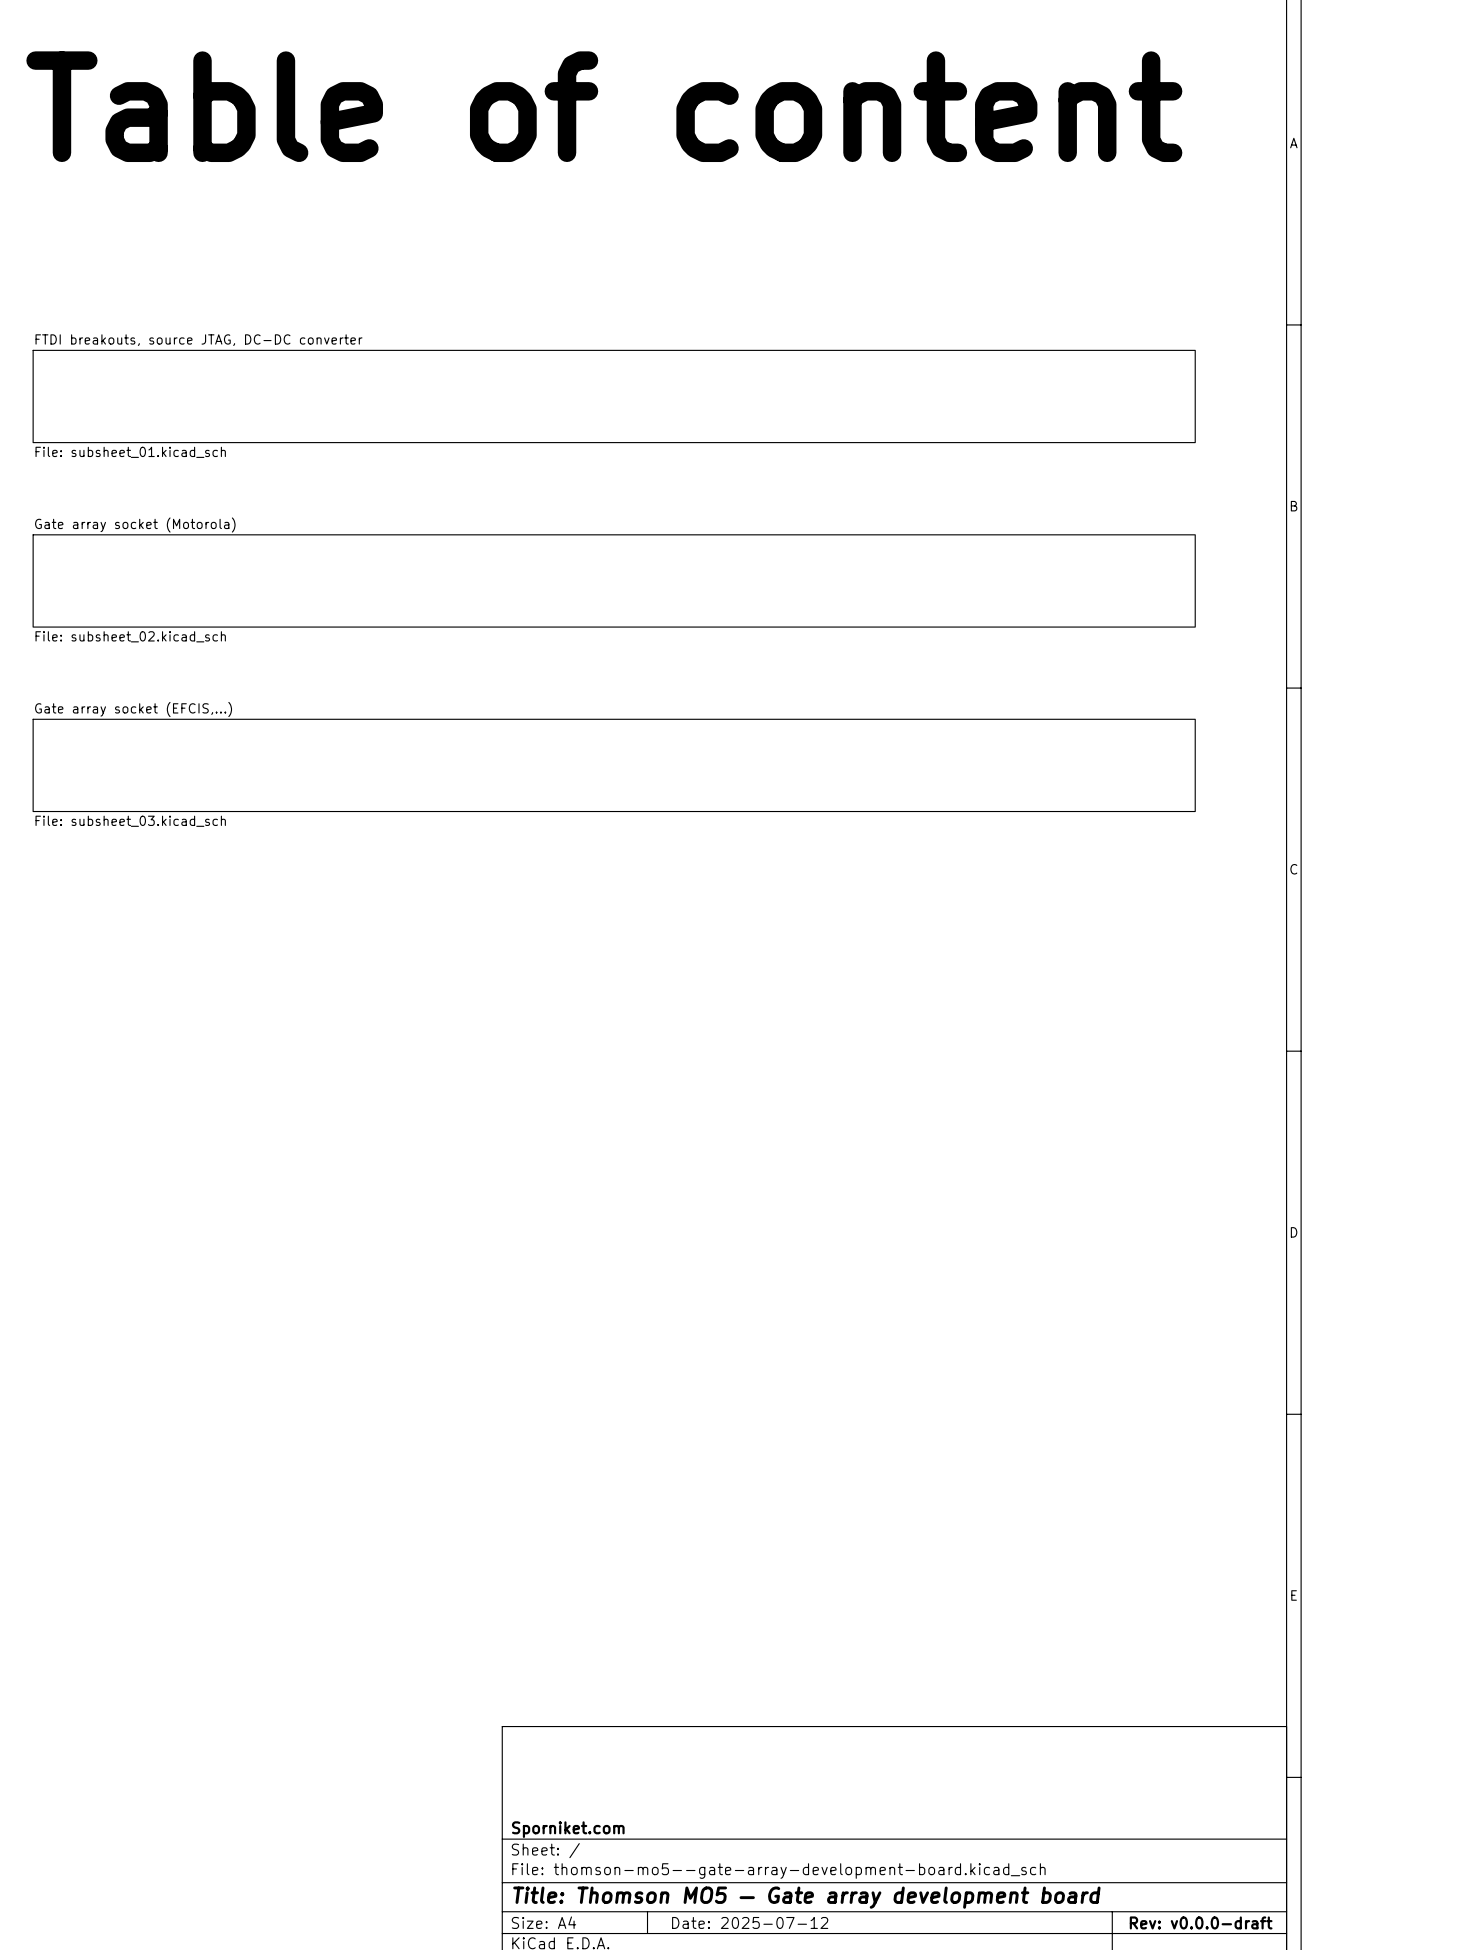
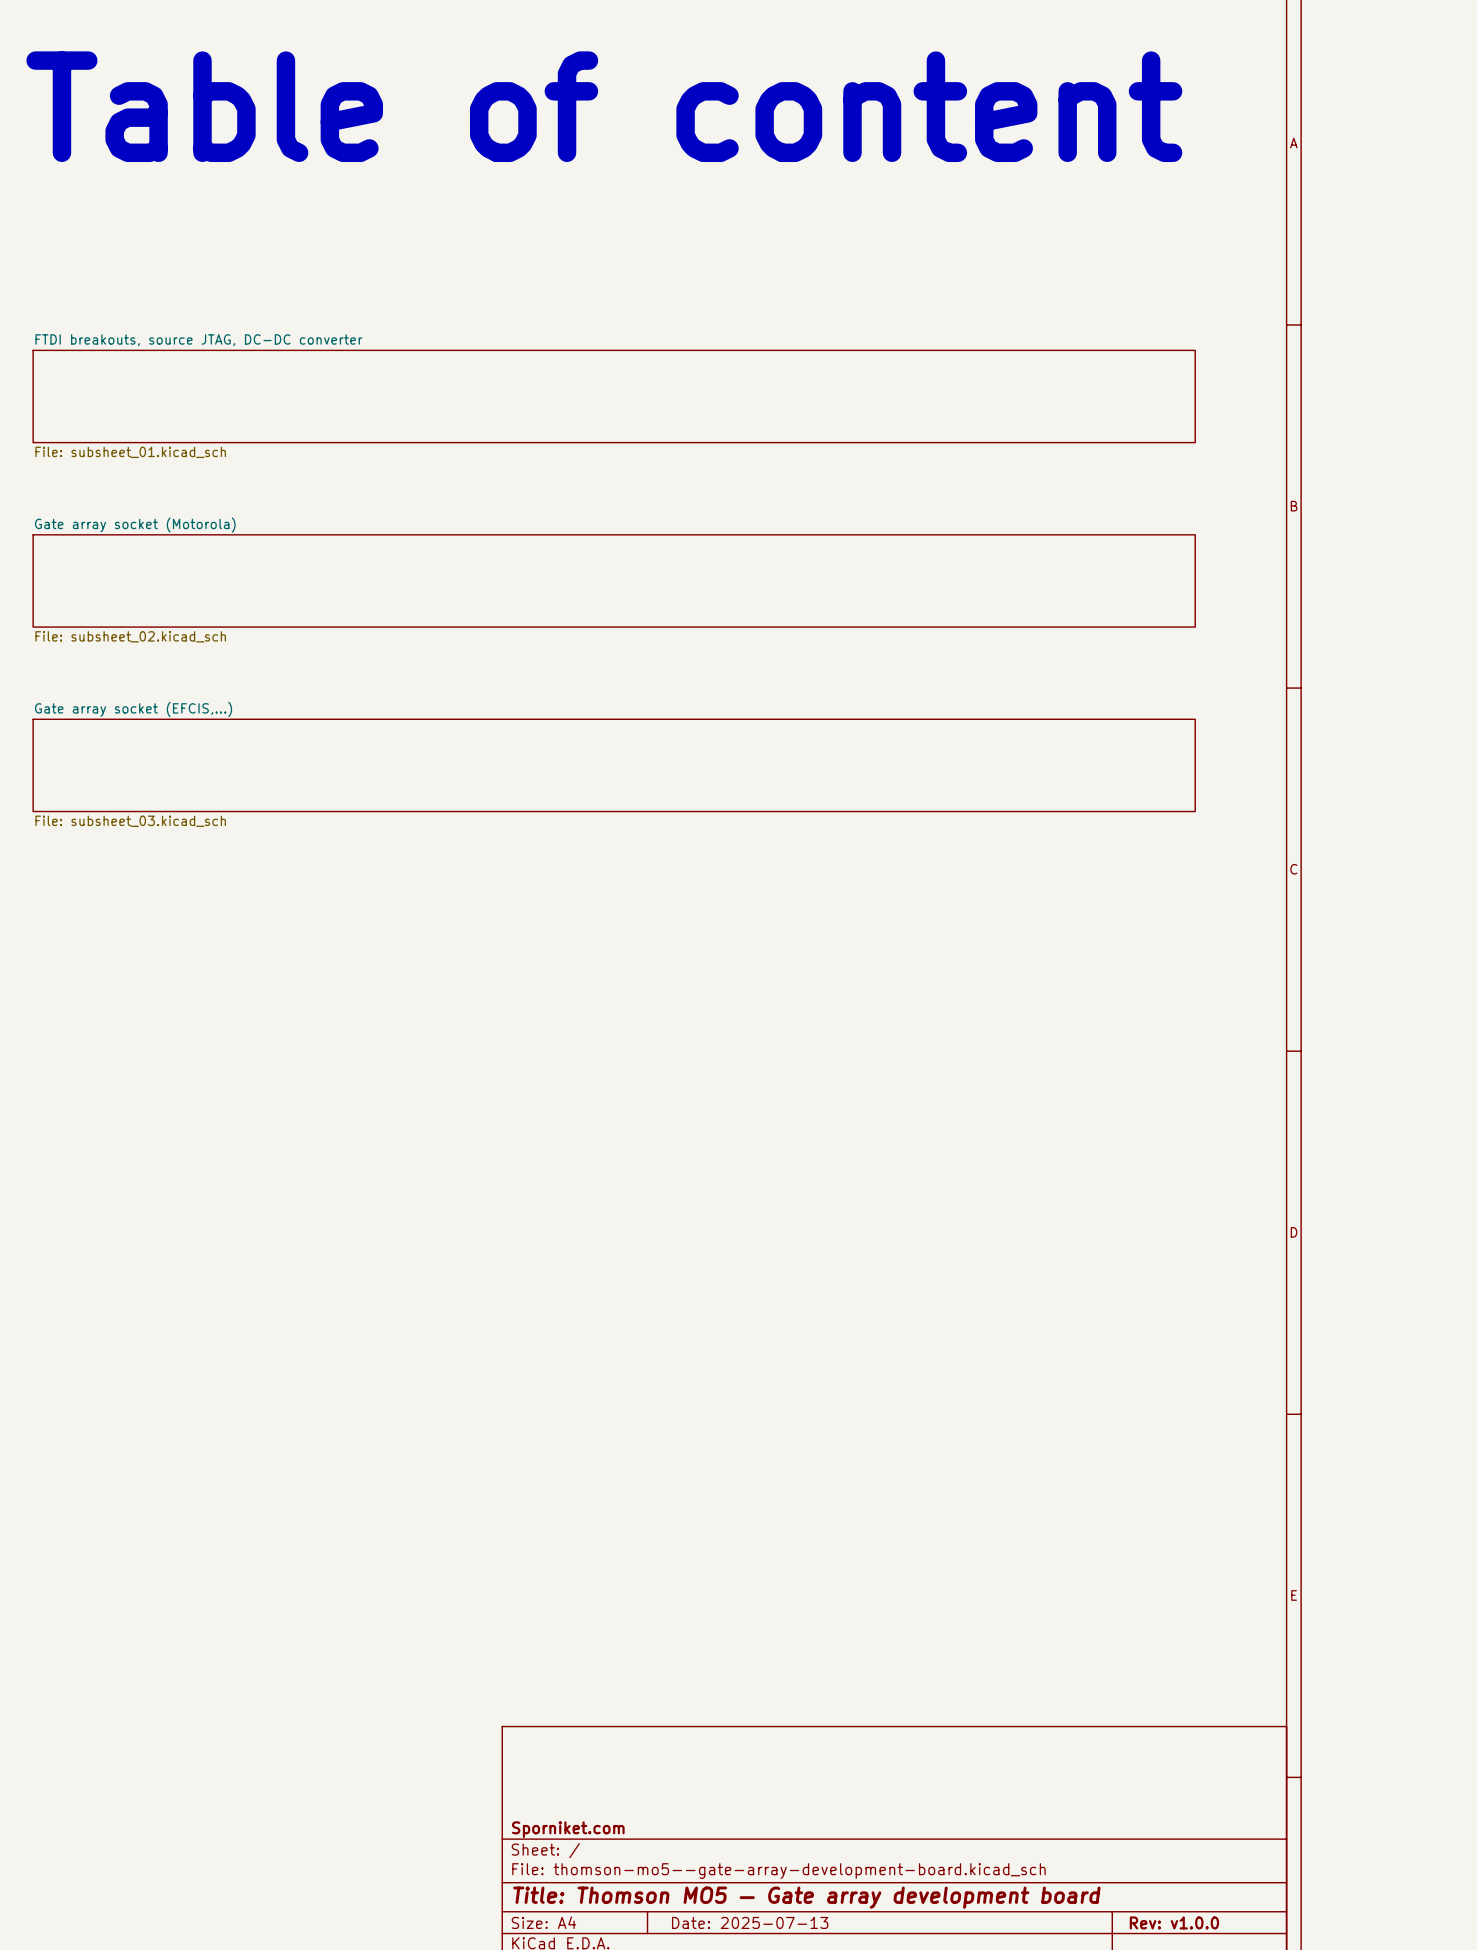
title block: Date: 2025-07-12 (750, 1922) -> Date: 2025-07-13 (750, 1922)
title block: Rev: v0.0.0-draft (1201, 1922) -> Rev: v1.0.0 (1174, 1922)

